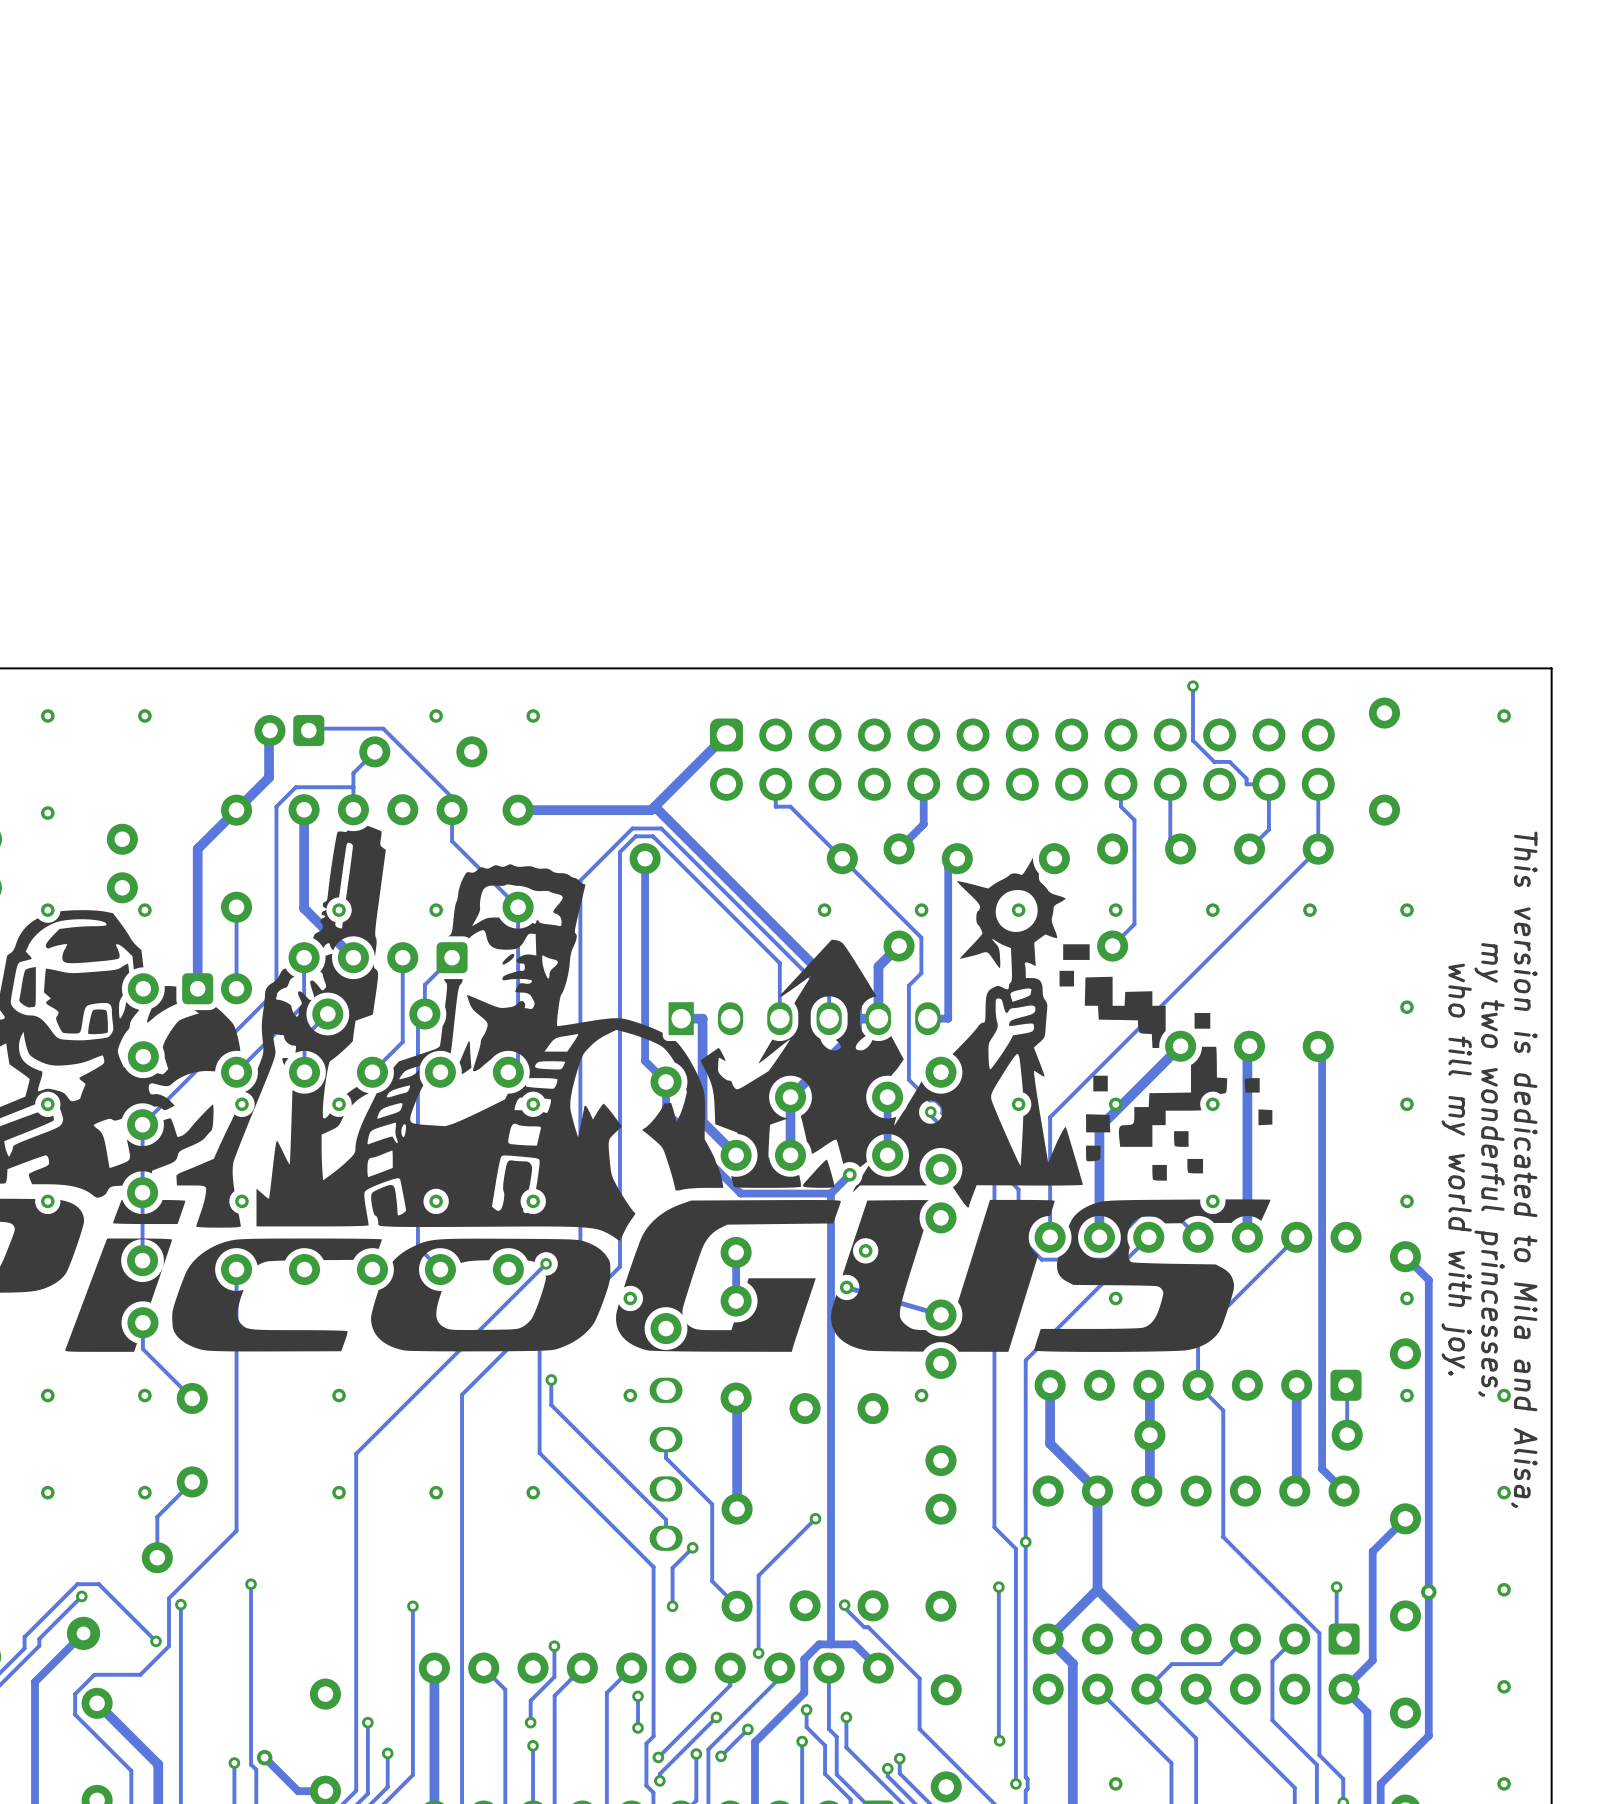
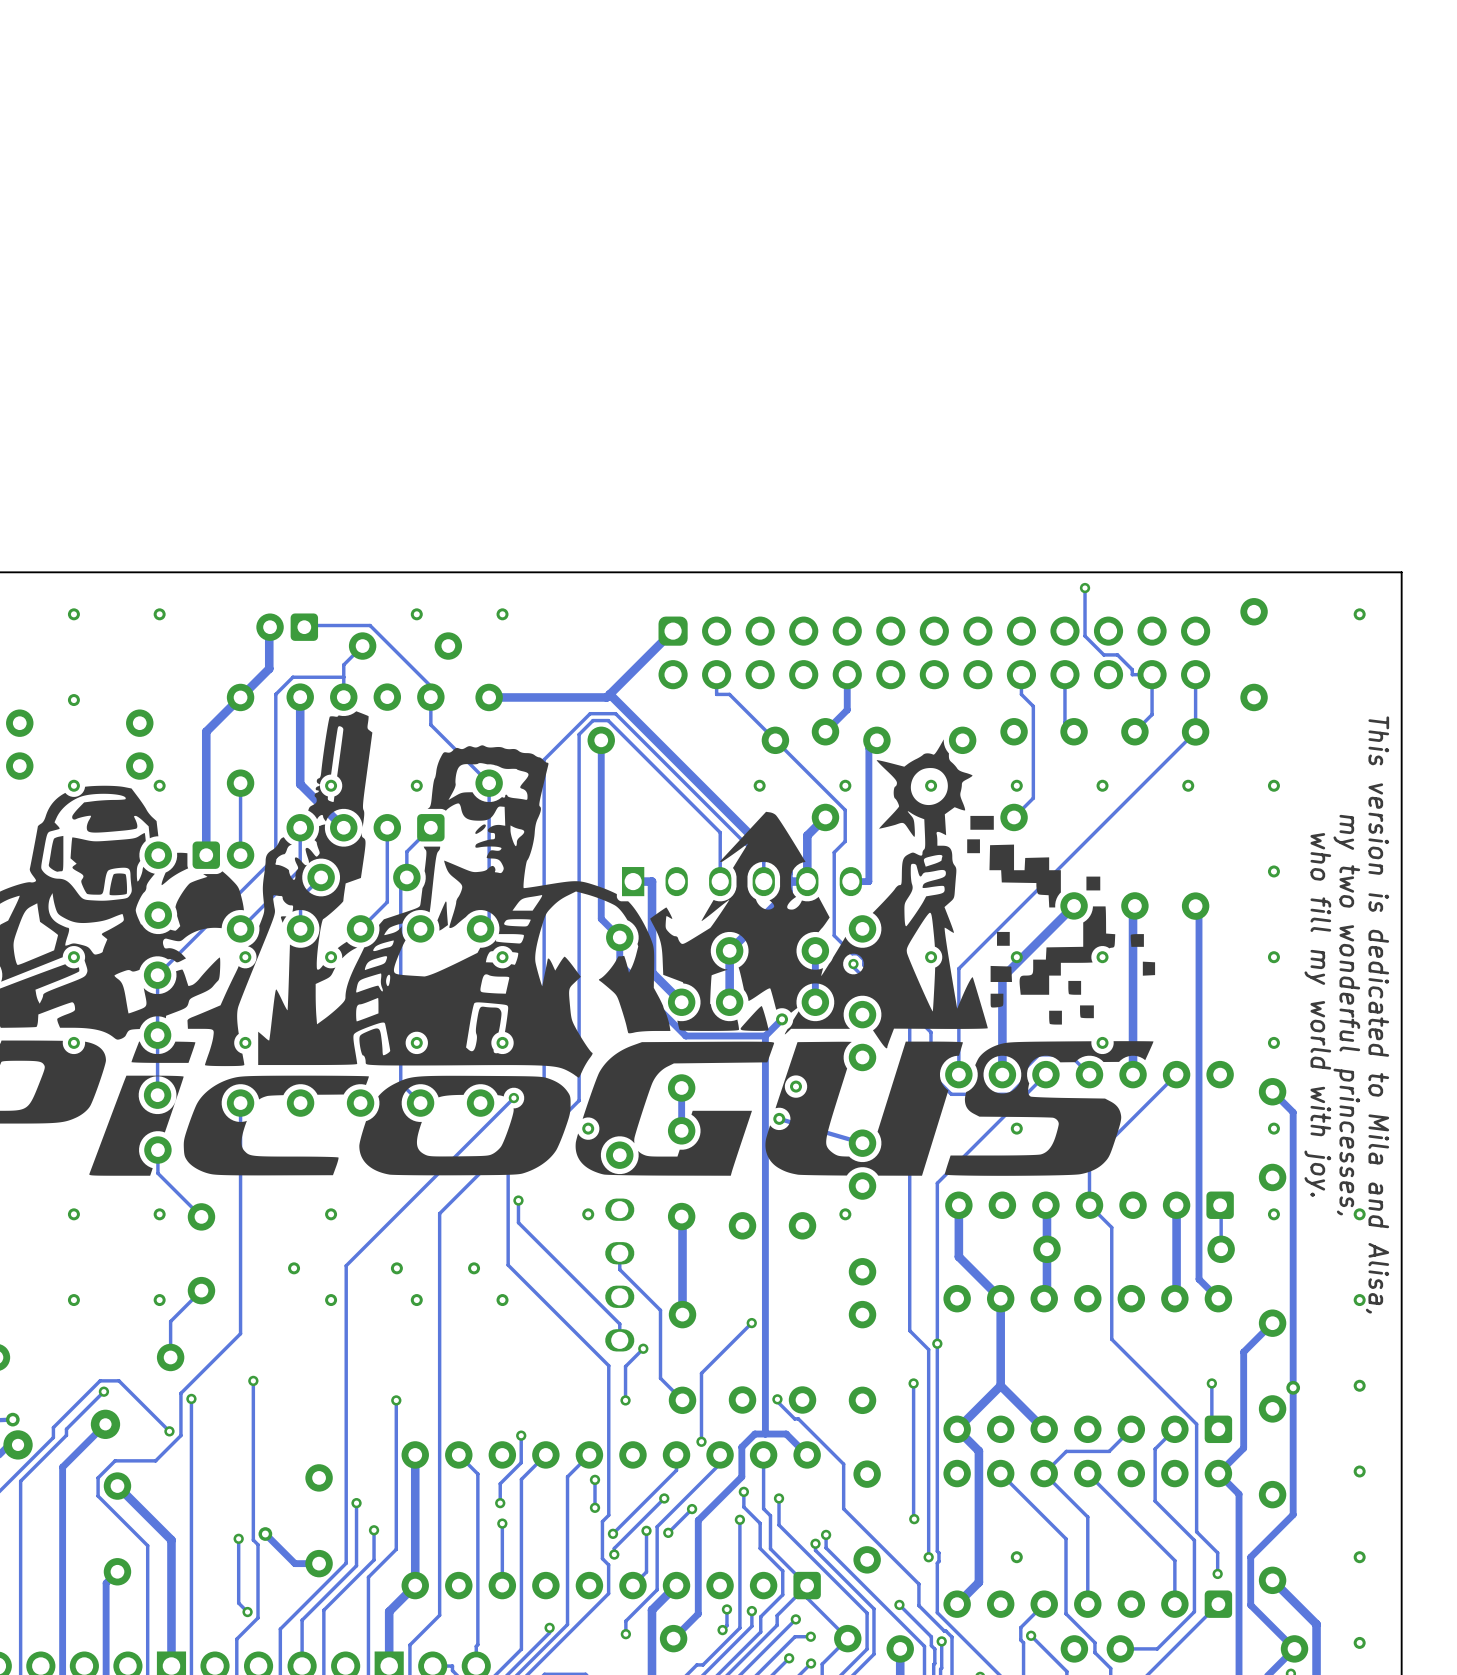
via: none -> (294, 1268)
via: none -> (396, 1268)
via: none -> (474, 1268)

